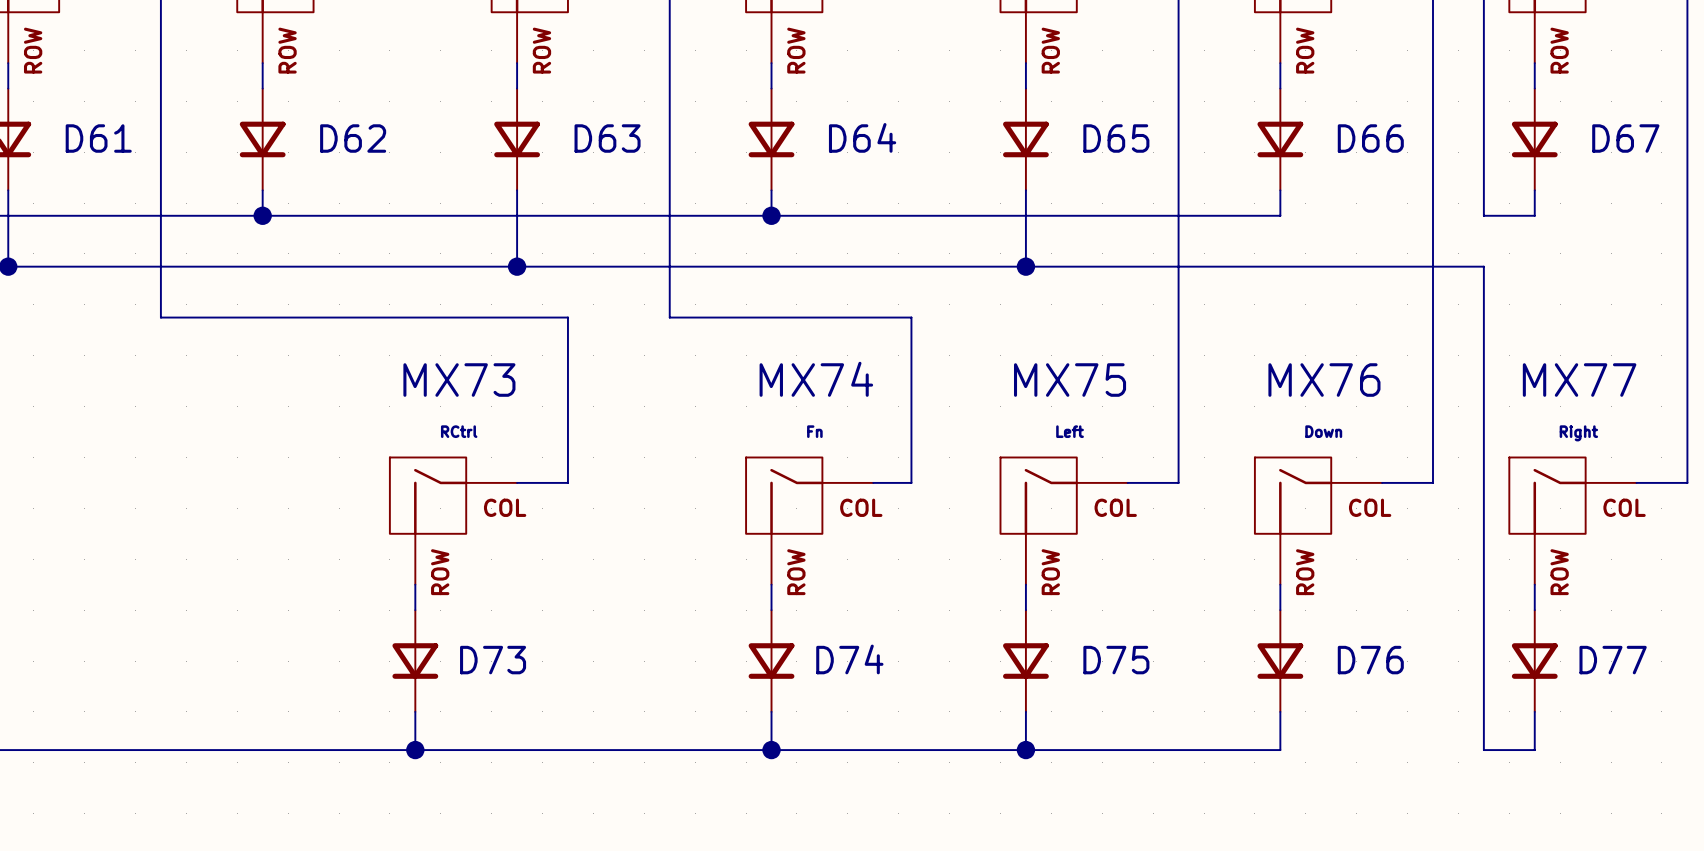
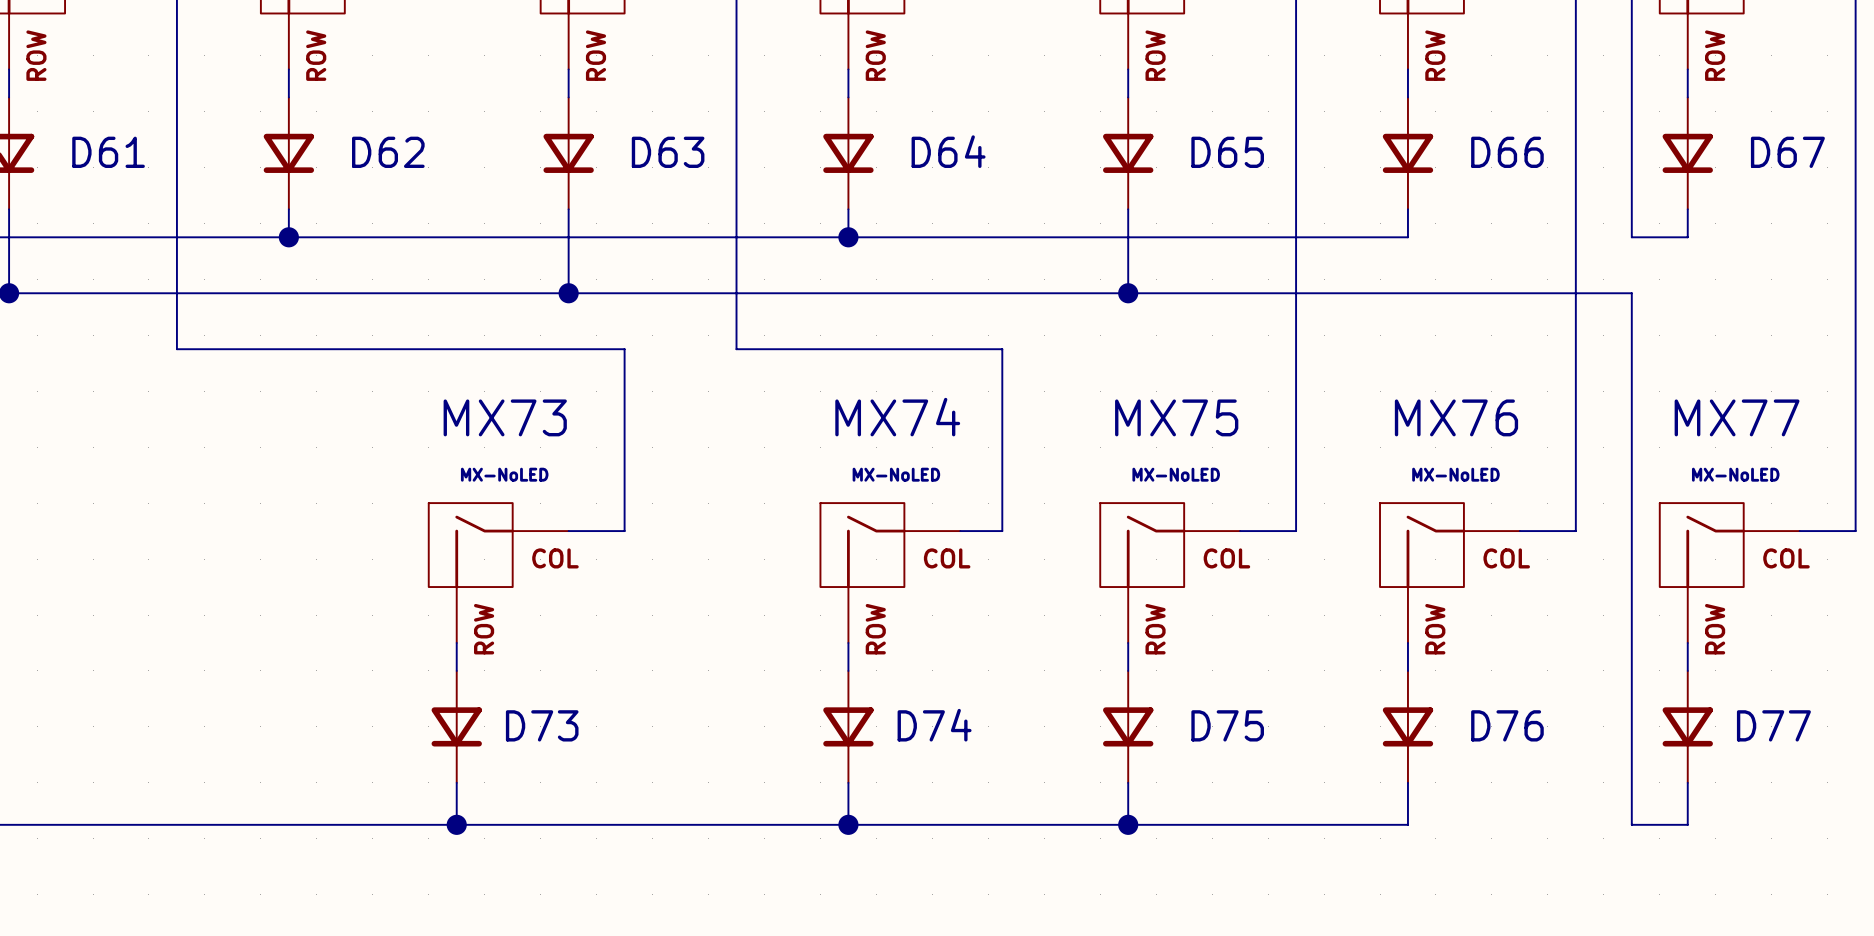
MX73 value: RCtrl (459, 431) -> MX-NoLED (504, 474)
MX74 value: Fn (814, 431) -> MX-NoLED (896, 474)
MX75 value: Left (1070, 431) -> MX-NoLED (1176, 474)
MX76 value: Down (1323, 431) -> MX-NoLED (1455, 474)
MX77 value: Right (1578, 433) -> MX-NoLED (1735, 474)

